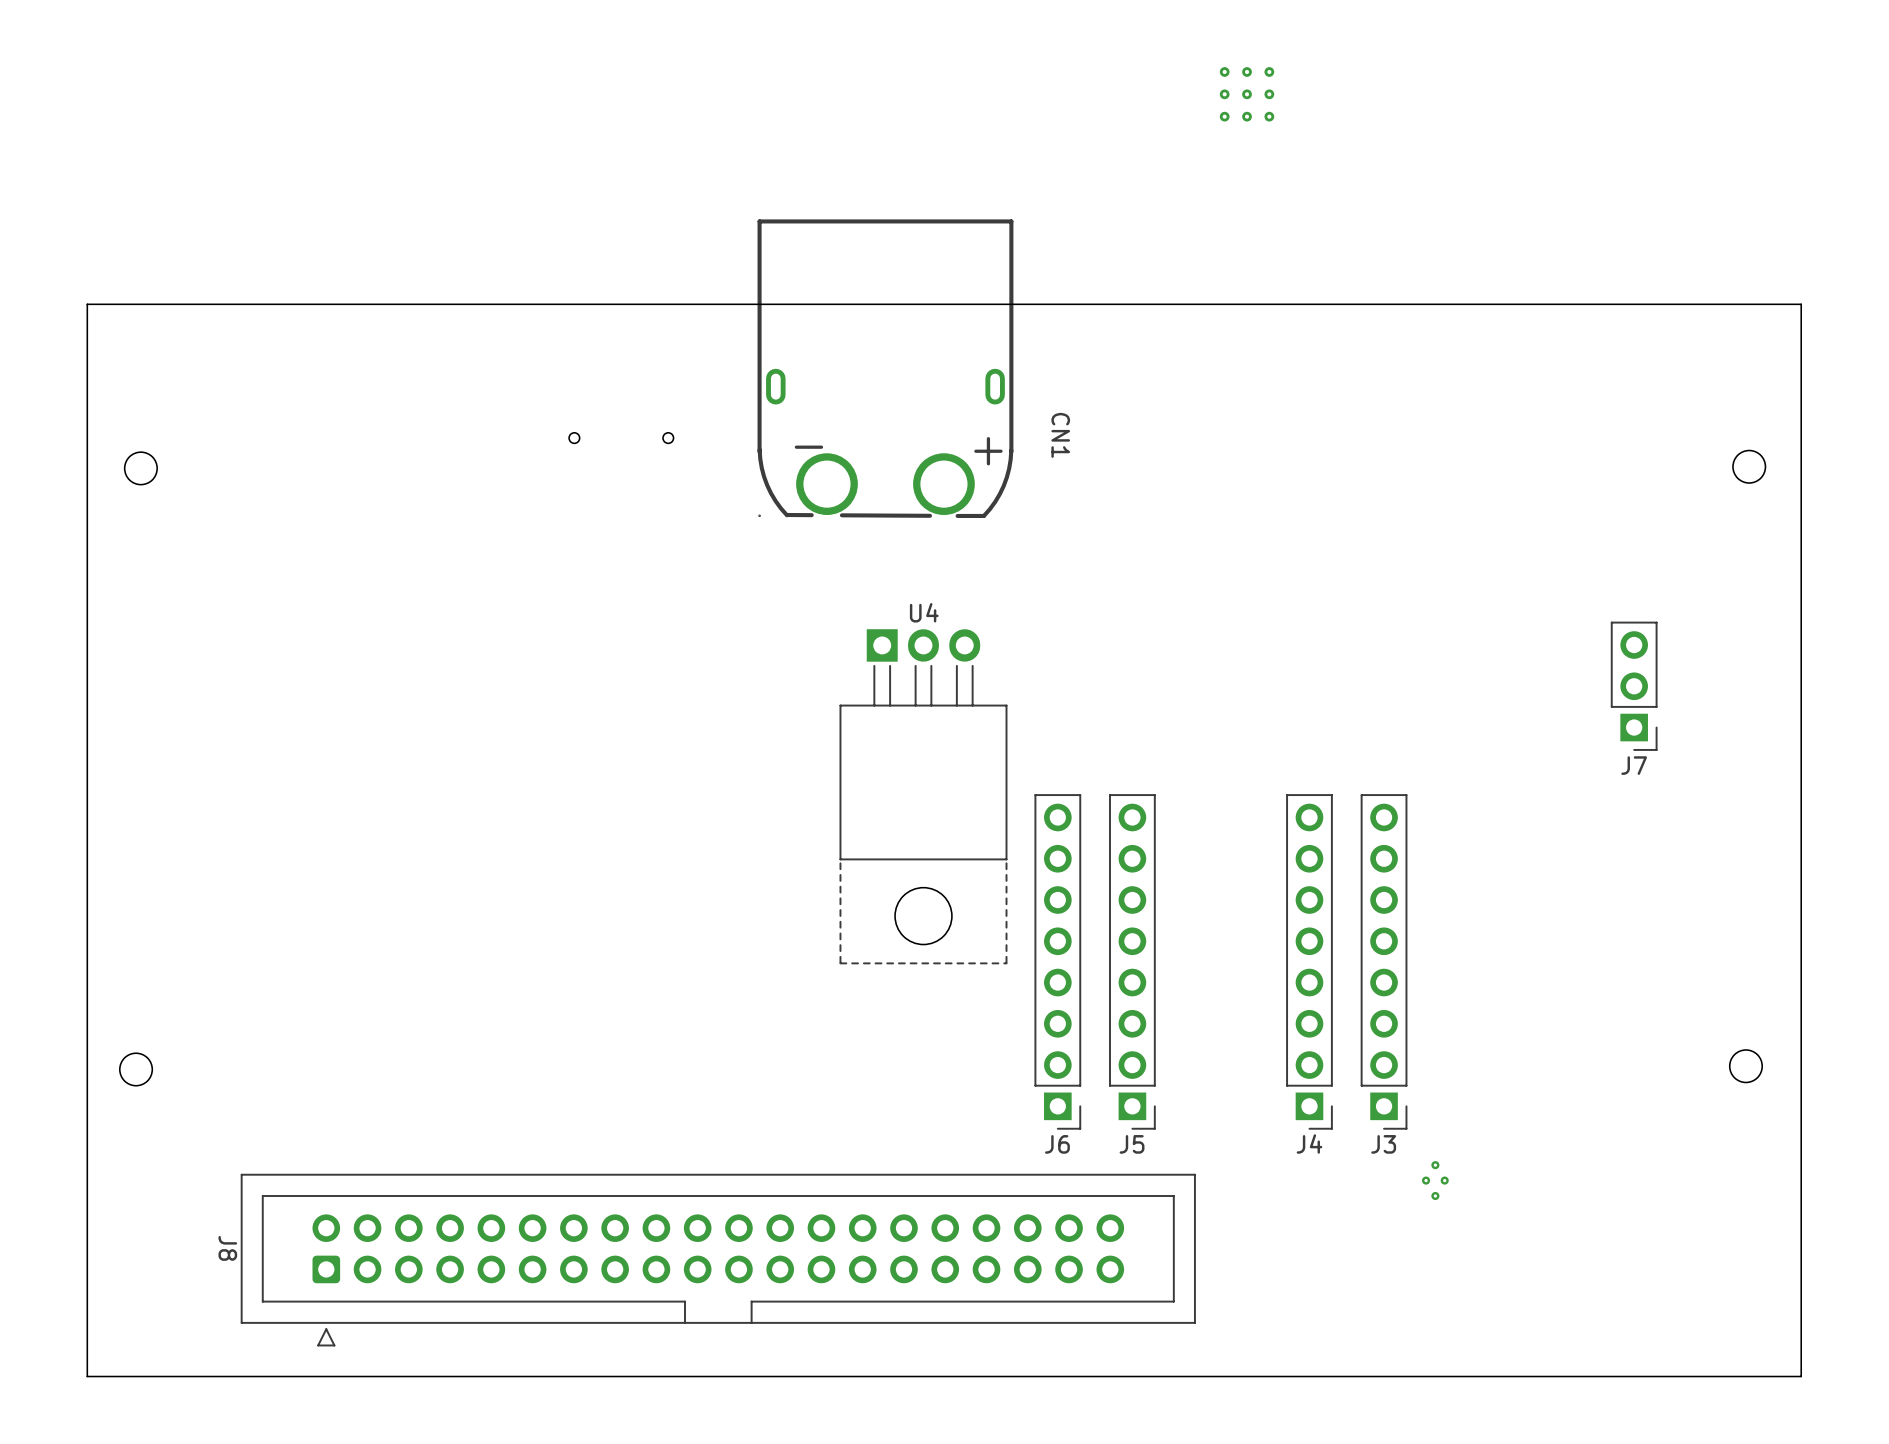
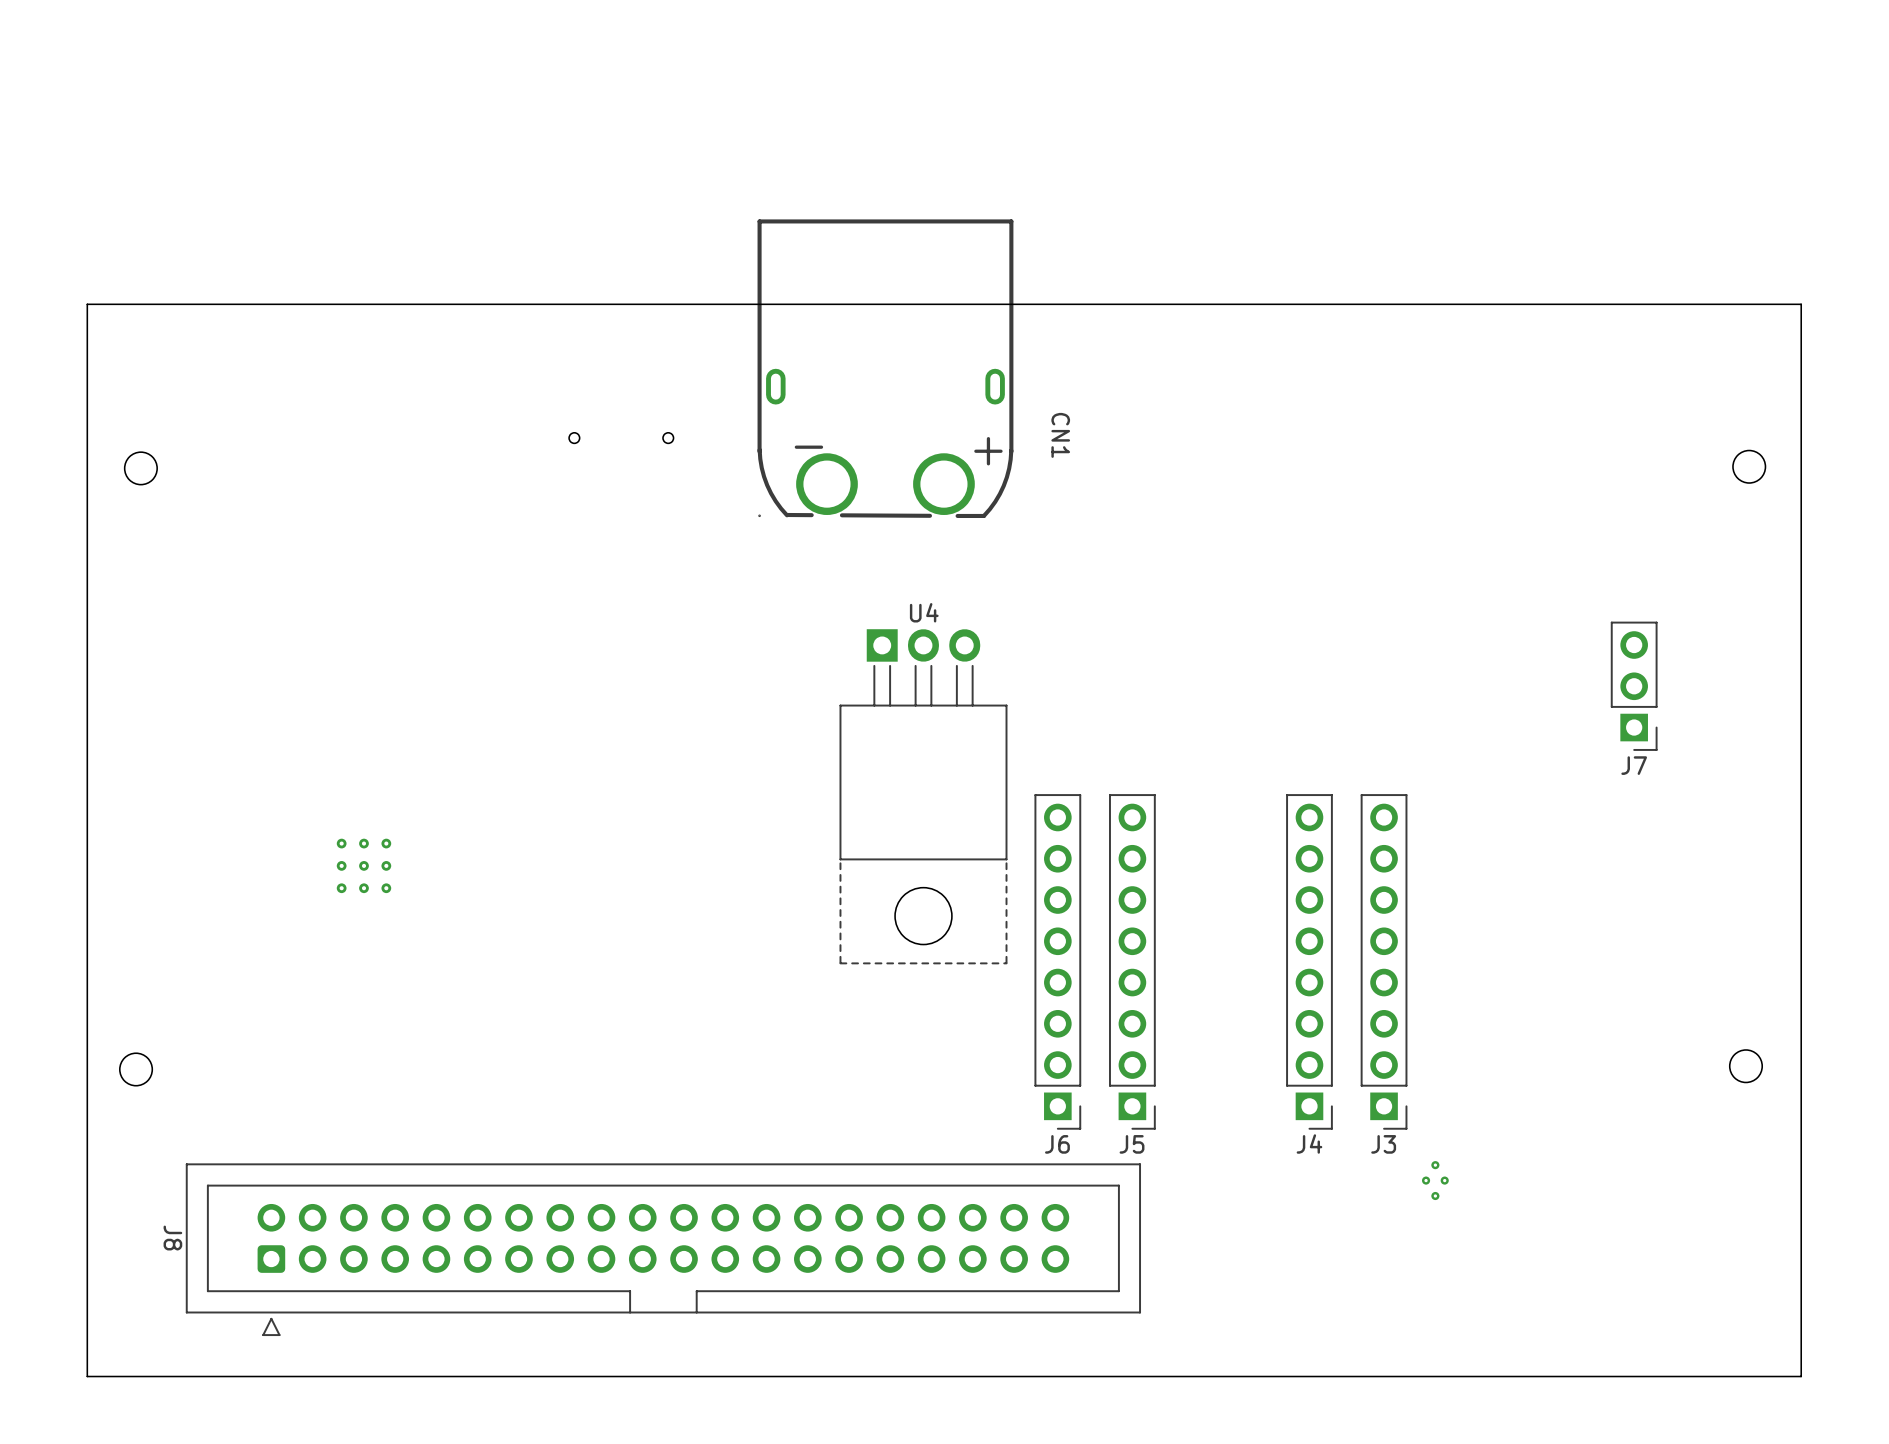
part: (1247, 94) -> none
part: none -> (363, 865)
J8 position: (718, 1260) -> (663, 1249)

